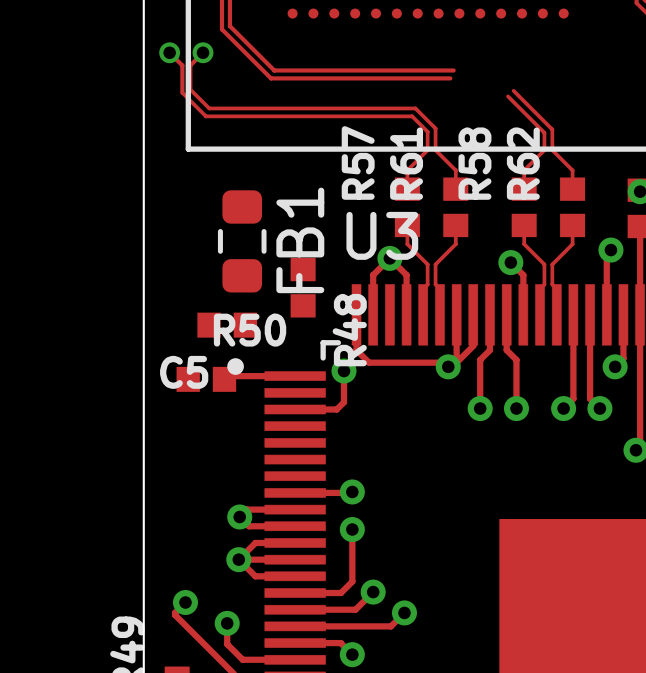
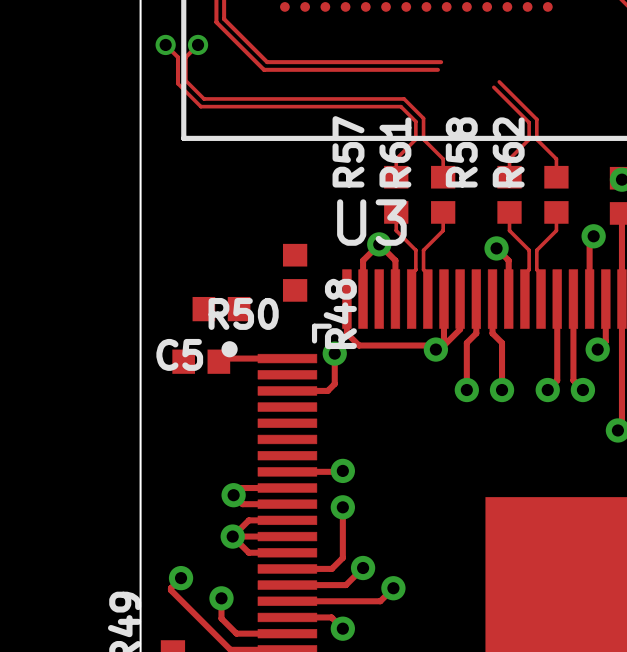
FB1: (242, 241) -> none

